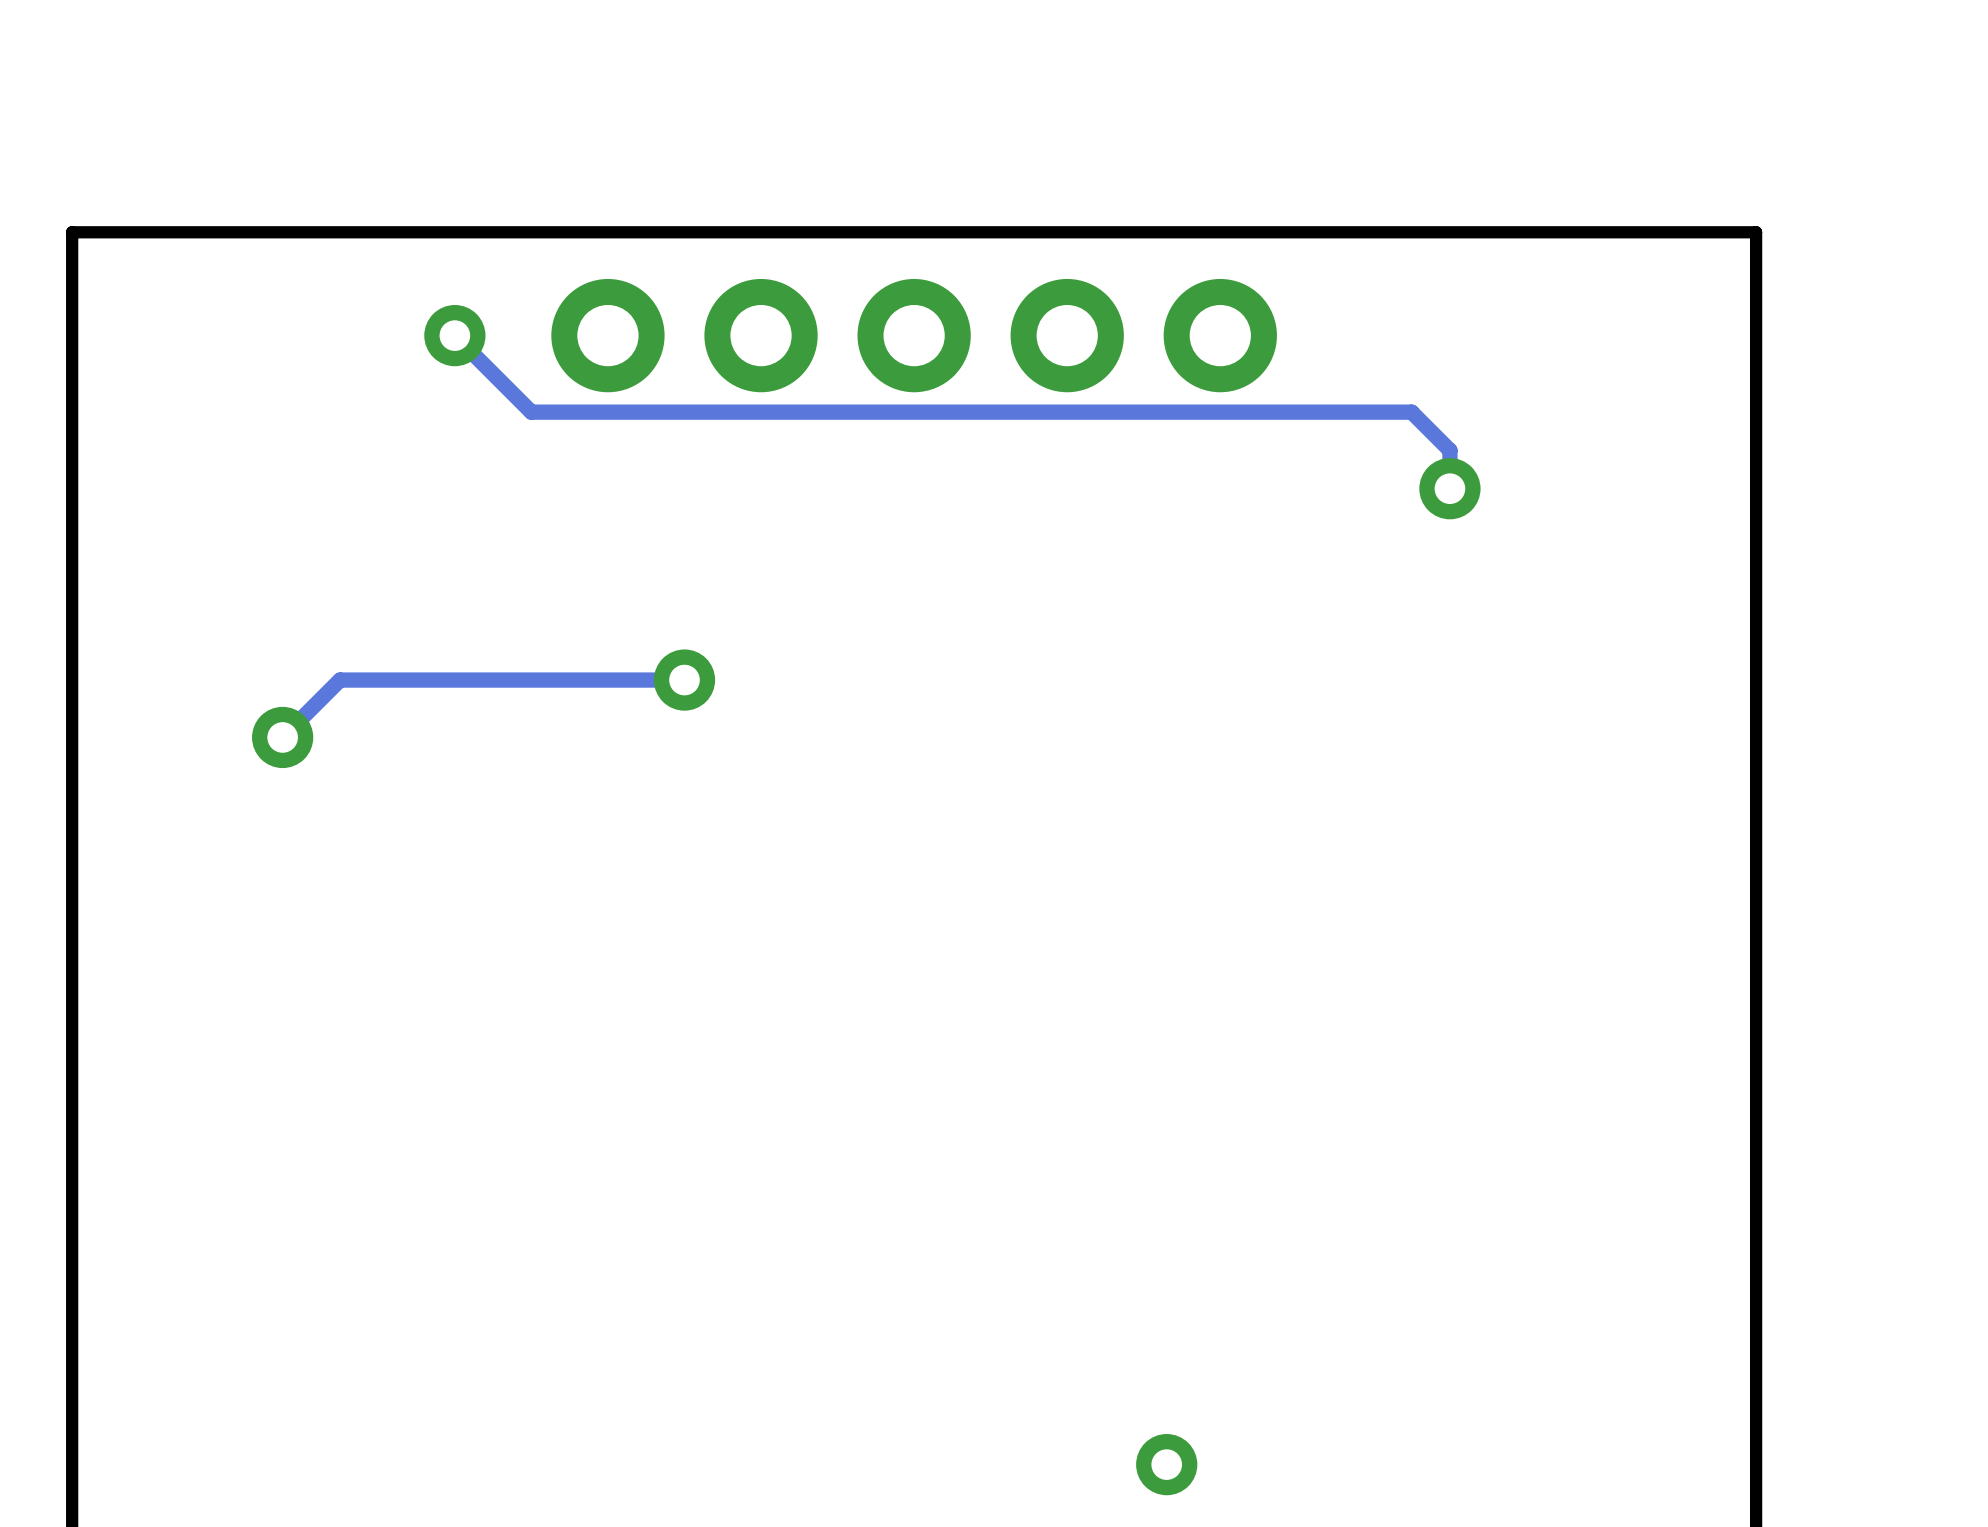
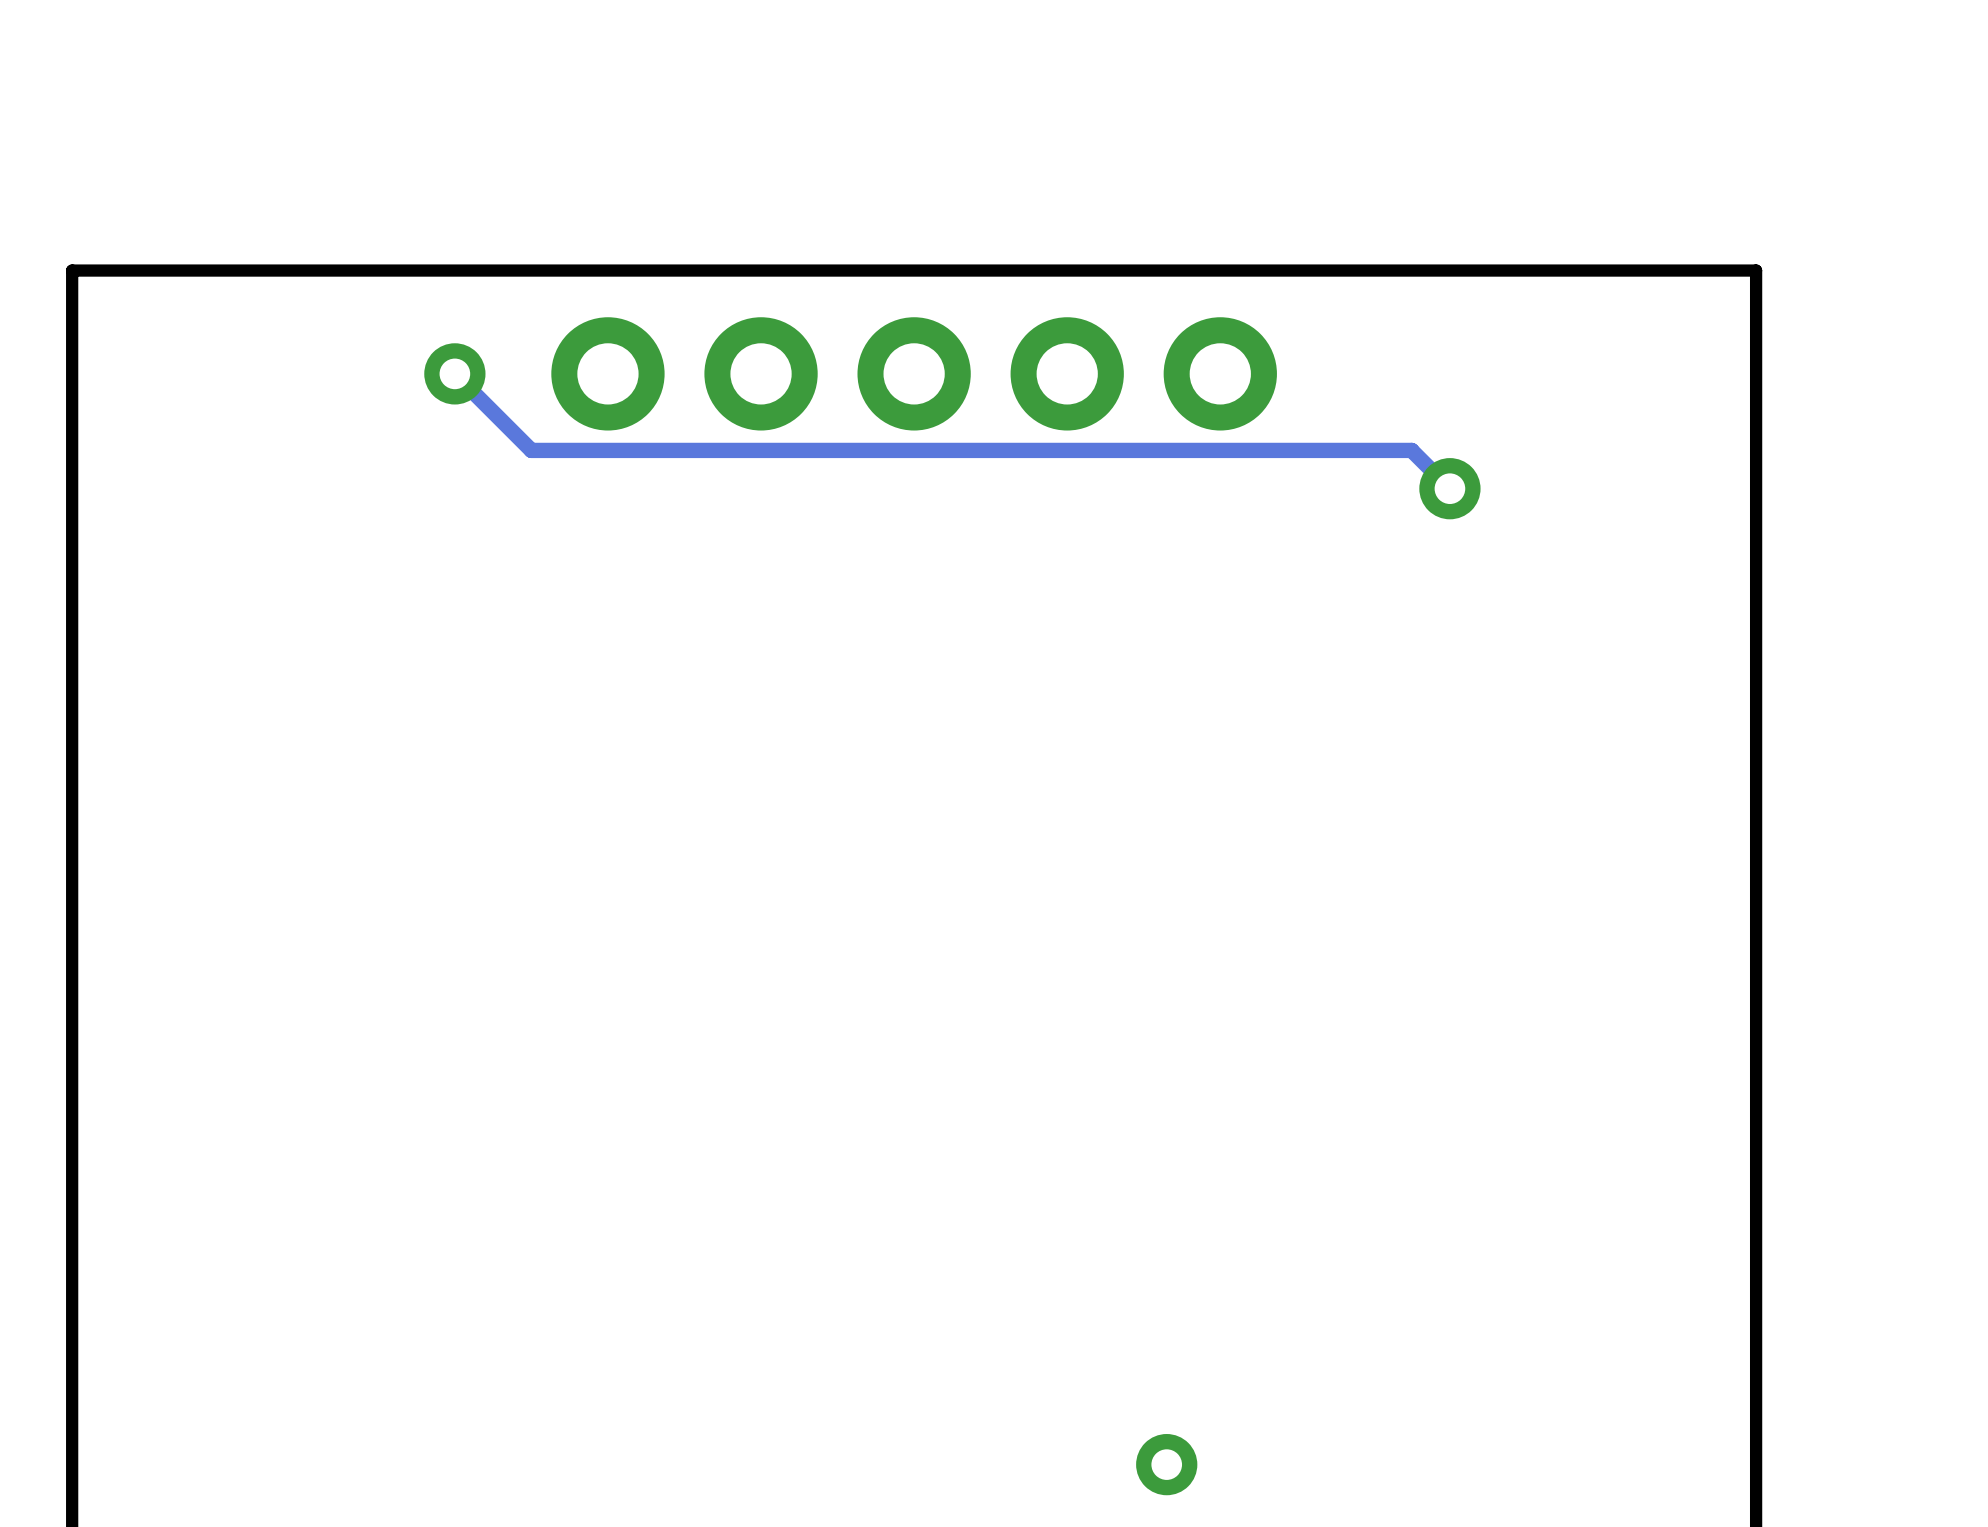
board edge: (1756, 270) (1756, 232) (72, 232) (72, 270) -> (1756, 270) (72, 270)
track: (454, 335) (531, 412) (1411, 412) (1449, 450) (1449, 488) -> (454, 373) (531, 450) (1411, 450) (1449, 488)
via position: (454, 335) -> (454, 373)
part position: (914, 335) -> (914, 373)
track: (684, 680) (340, 680) (282, 737) -> none
via: (684, 680) -> none
via: (282, 737) -> none

